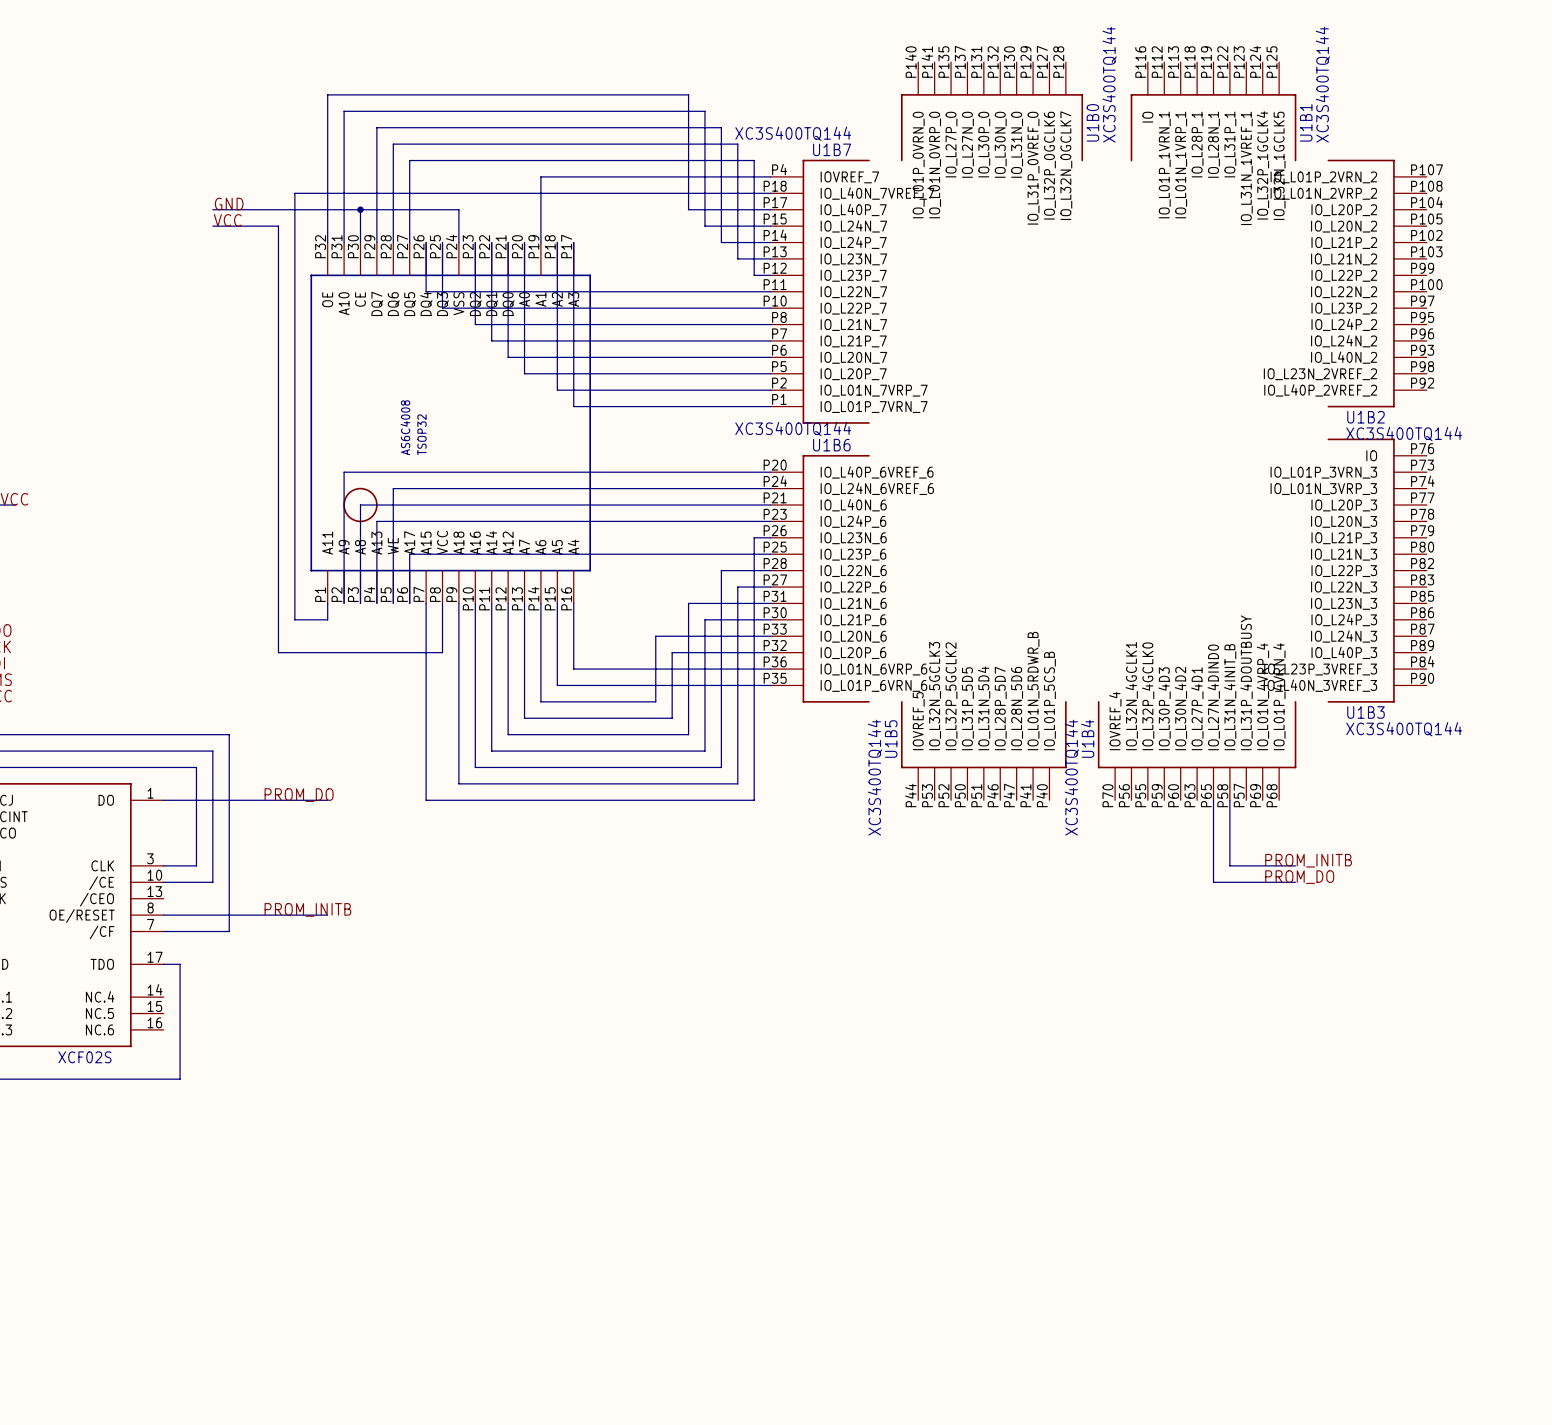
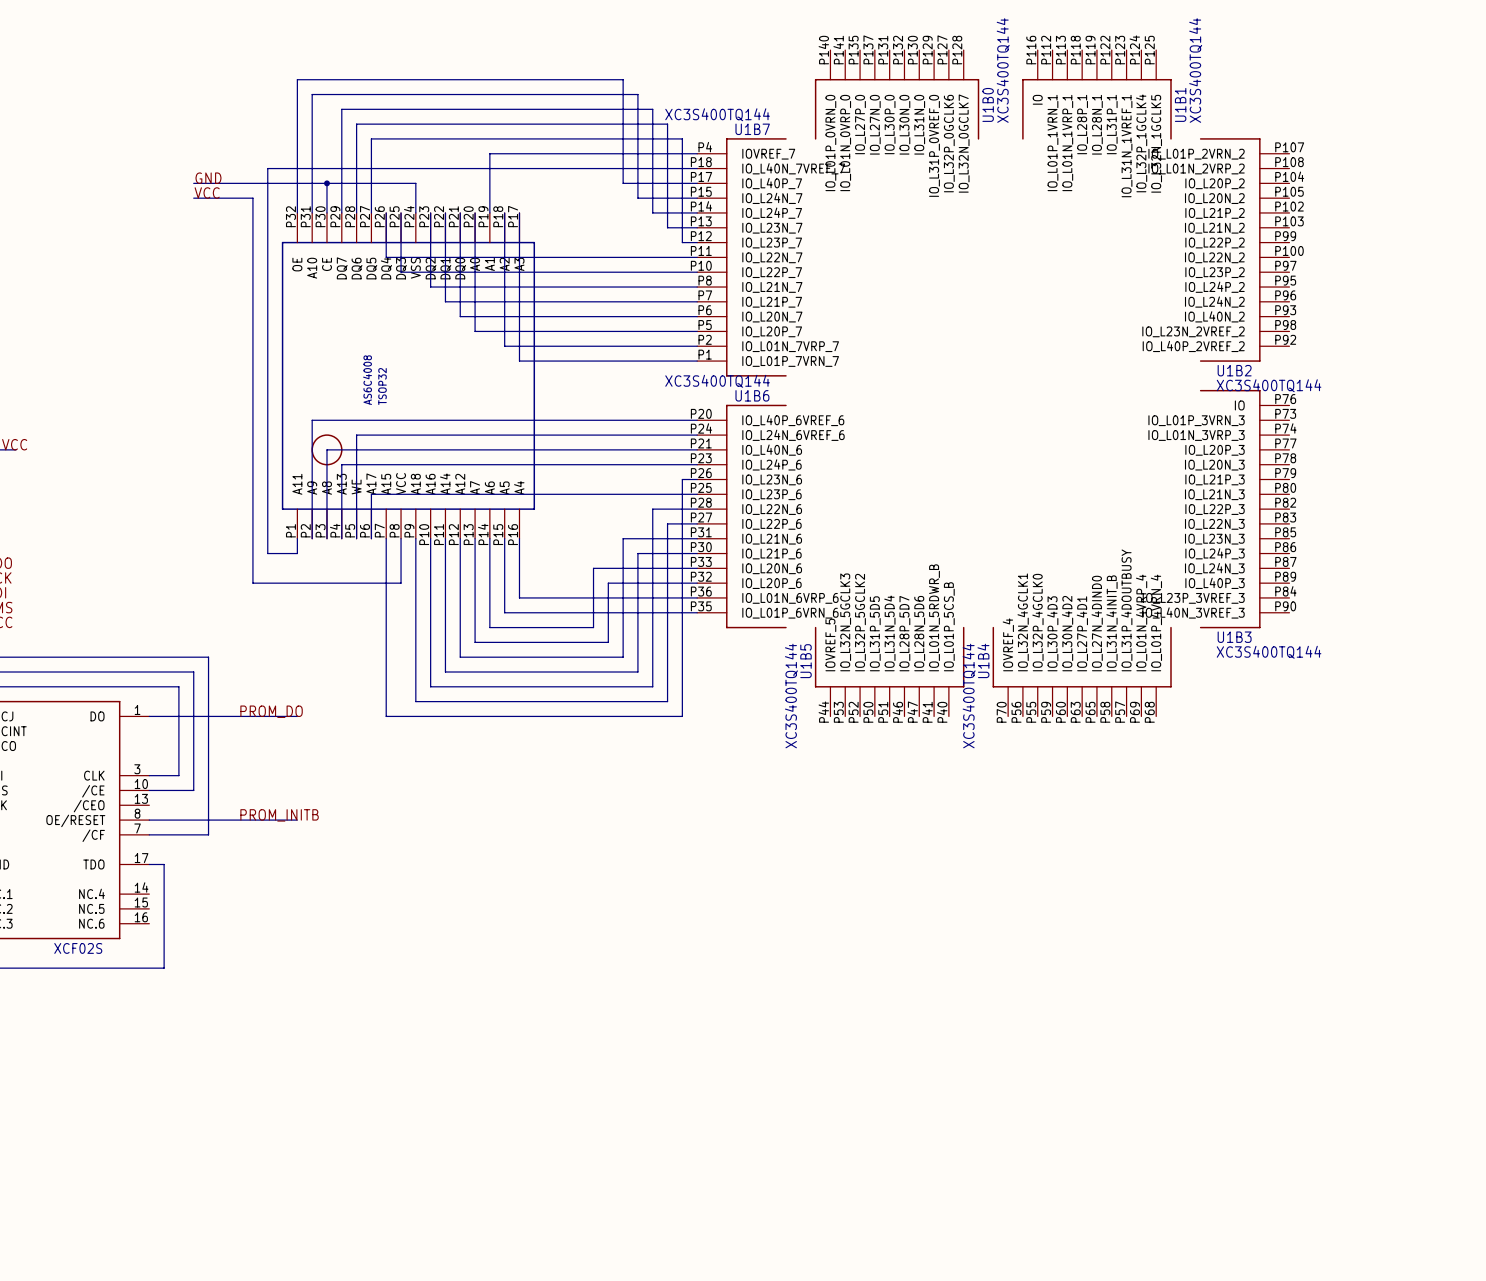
wire: (1213, 800) (1213, 882) (1295, 882) -> none
wire: (1229, 800) (1229, 865) (1295, 865) -> none
label: PROM_INITB (1308, 860) -> none
label: PROM_DO (1299, 877) -> none

